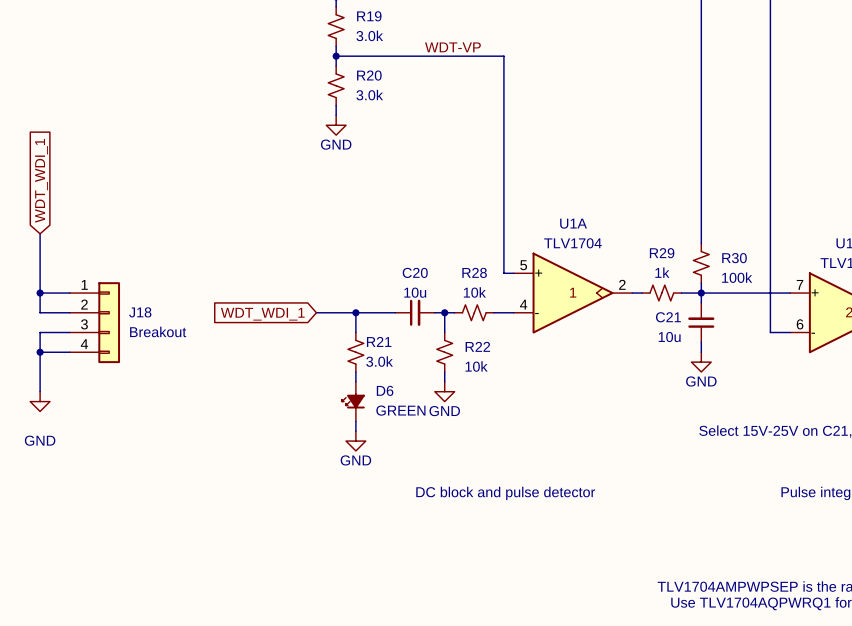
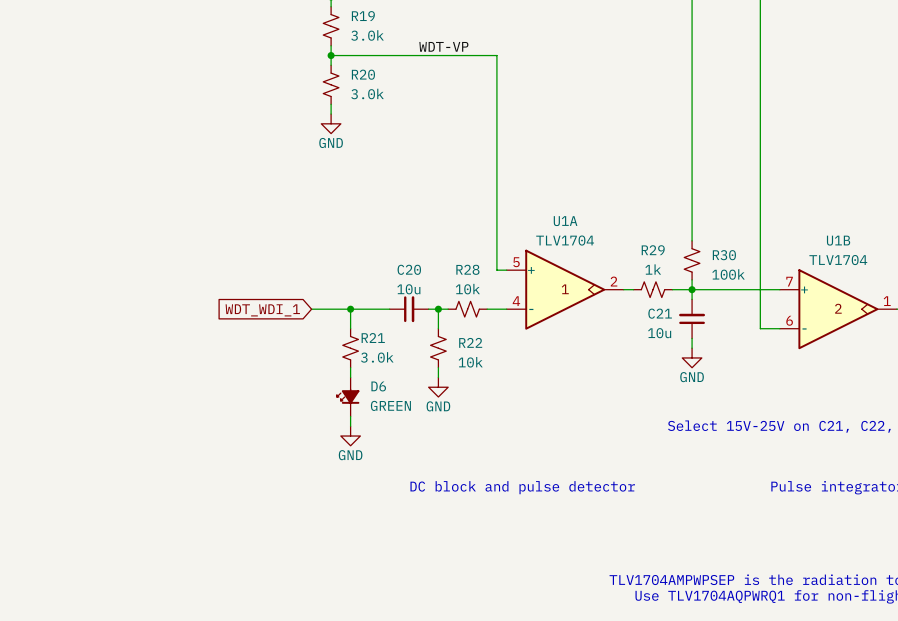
global label: WDT_WDI_1 (41, 180) -> none
wire: (40, 233) (40, 312) (69, 312) -> none
wire: (40, 293) (69, 293) -> none
junction: (40, 293) -> none
J18: Breakout (94, 322) -> none
wire: (69, 332) (40, 332) (40, 391) -> none
wire: (40, 352) (69, 352) -> none
junction: (40, 352) -> none
power symbol: GND (40, 401) -> none

